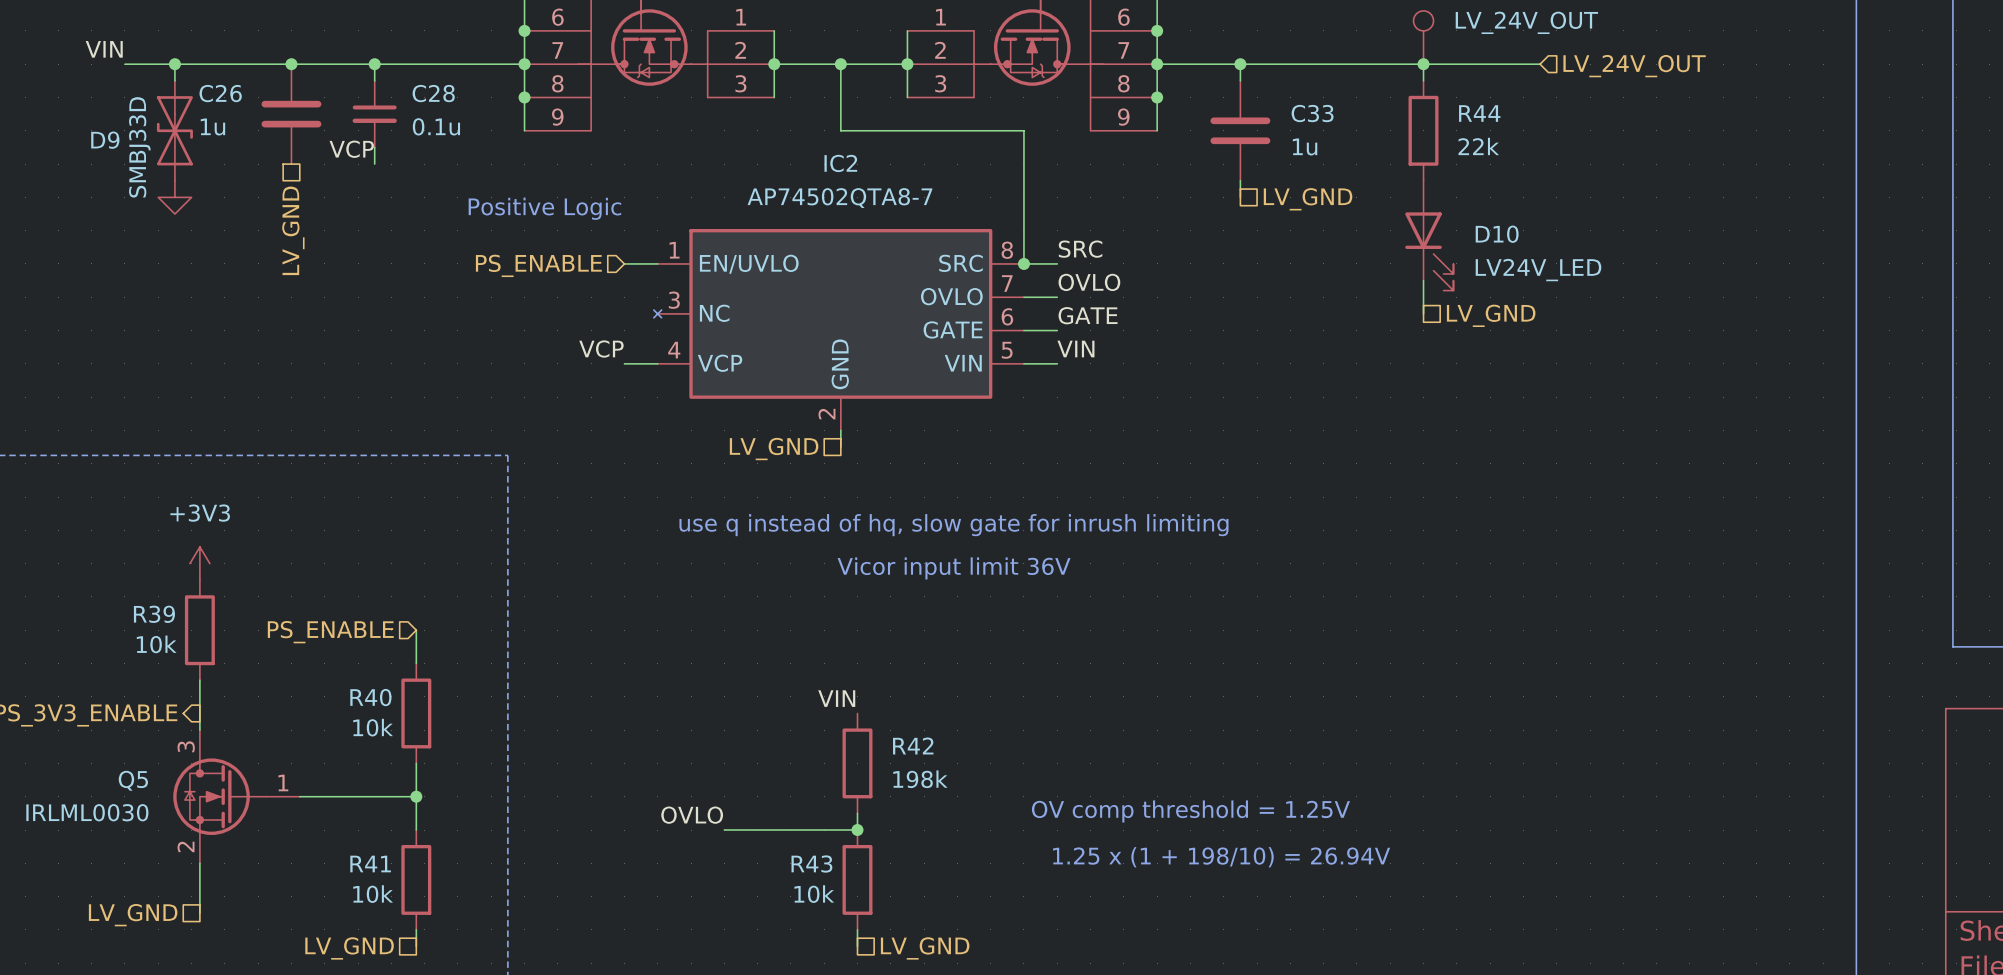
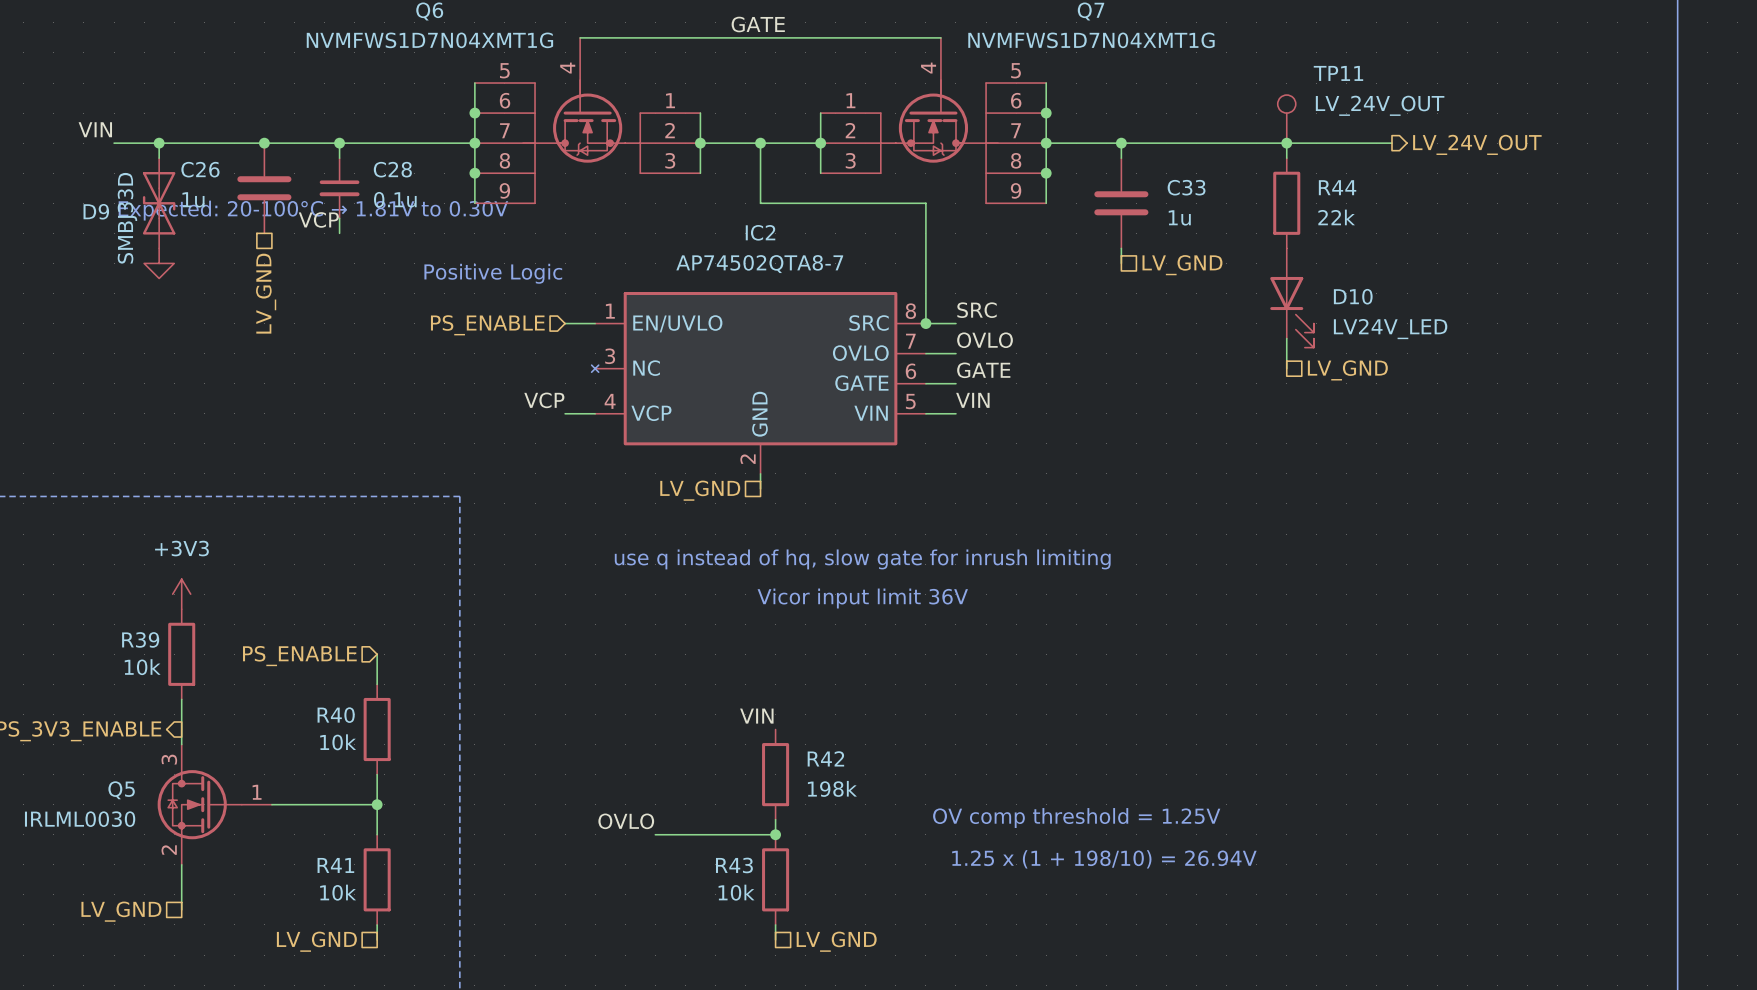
hierarchical label shape: input (1634, 66) -> output (1477, 144)
text: none -> Expected: 20-100°C → 1.81V to 0.30V (313, 210)

